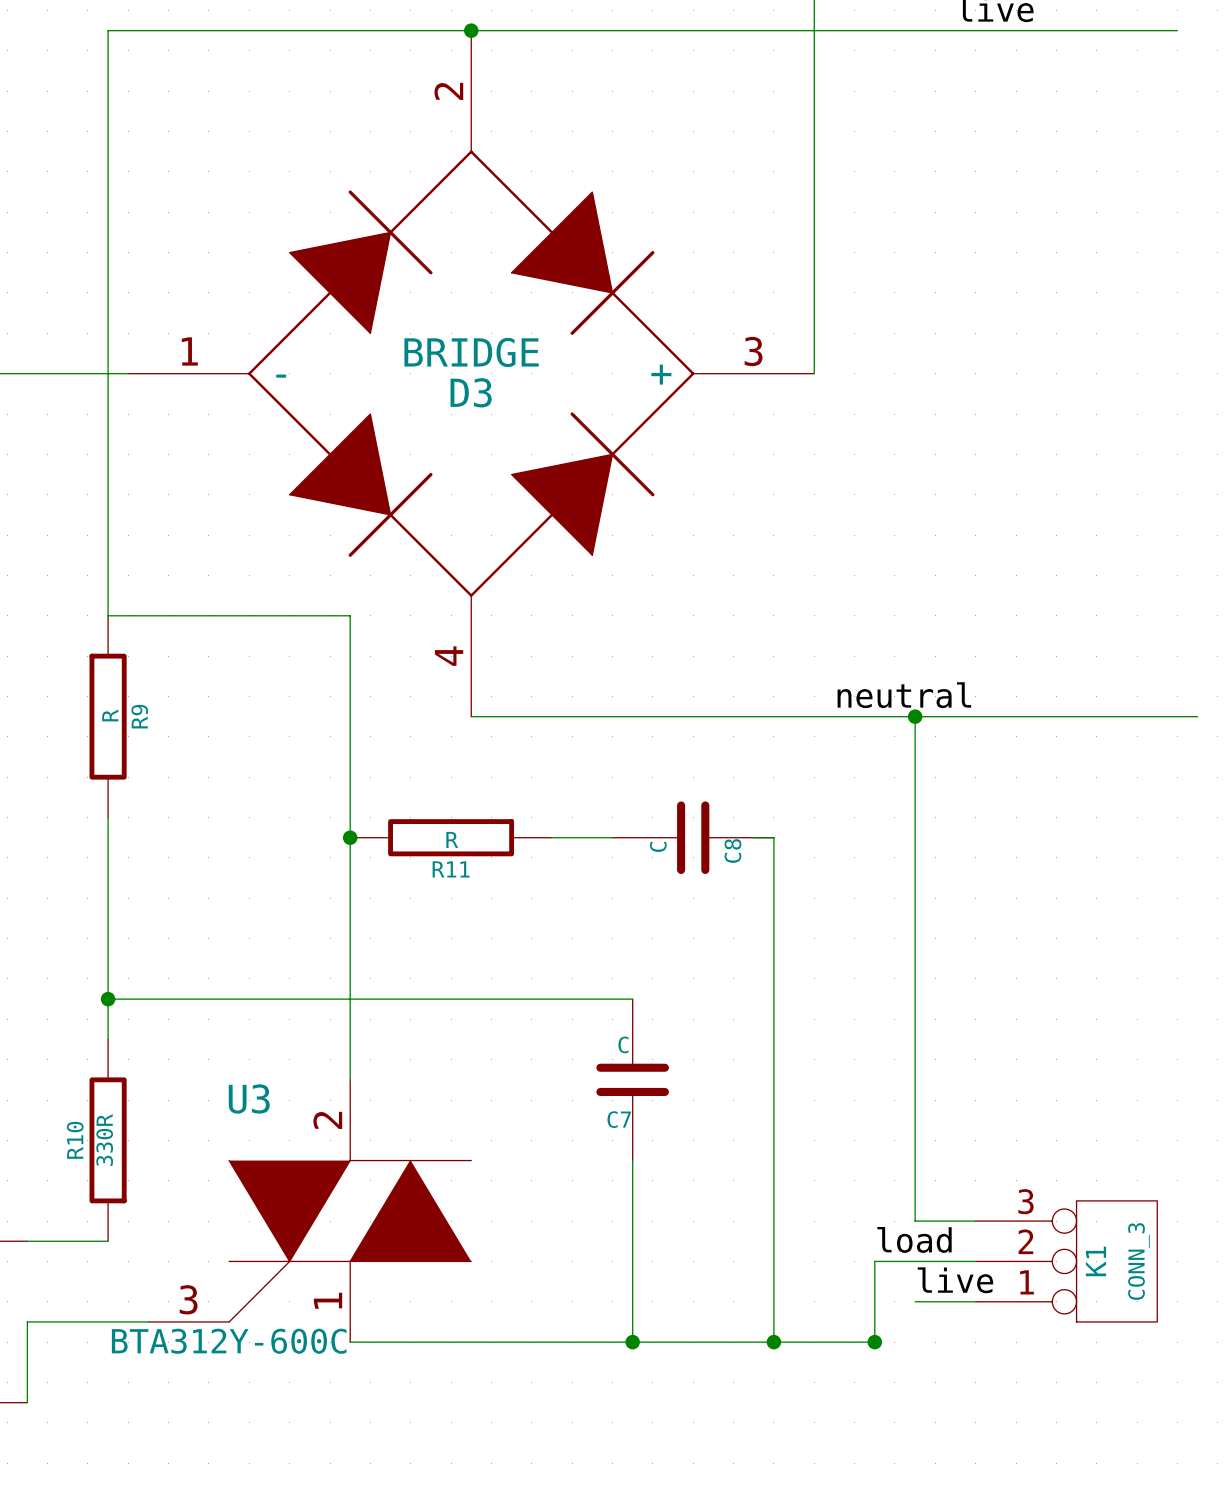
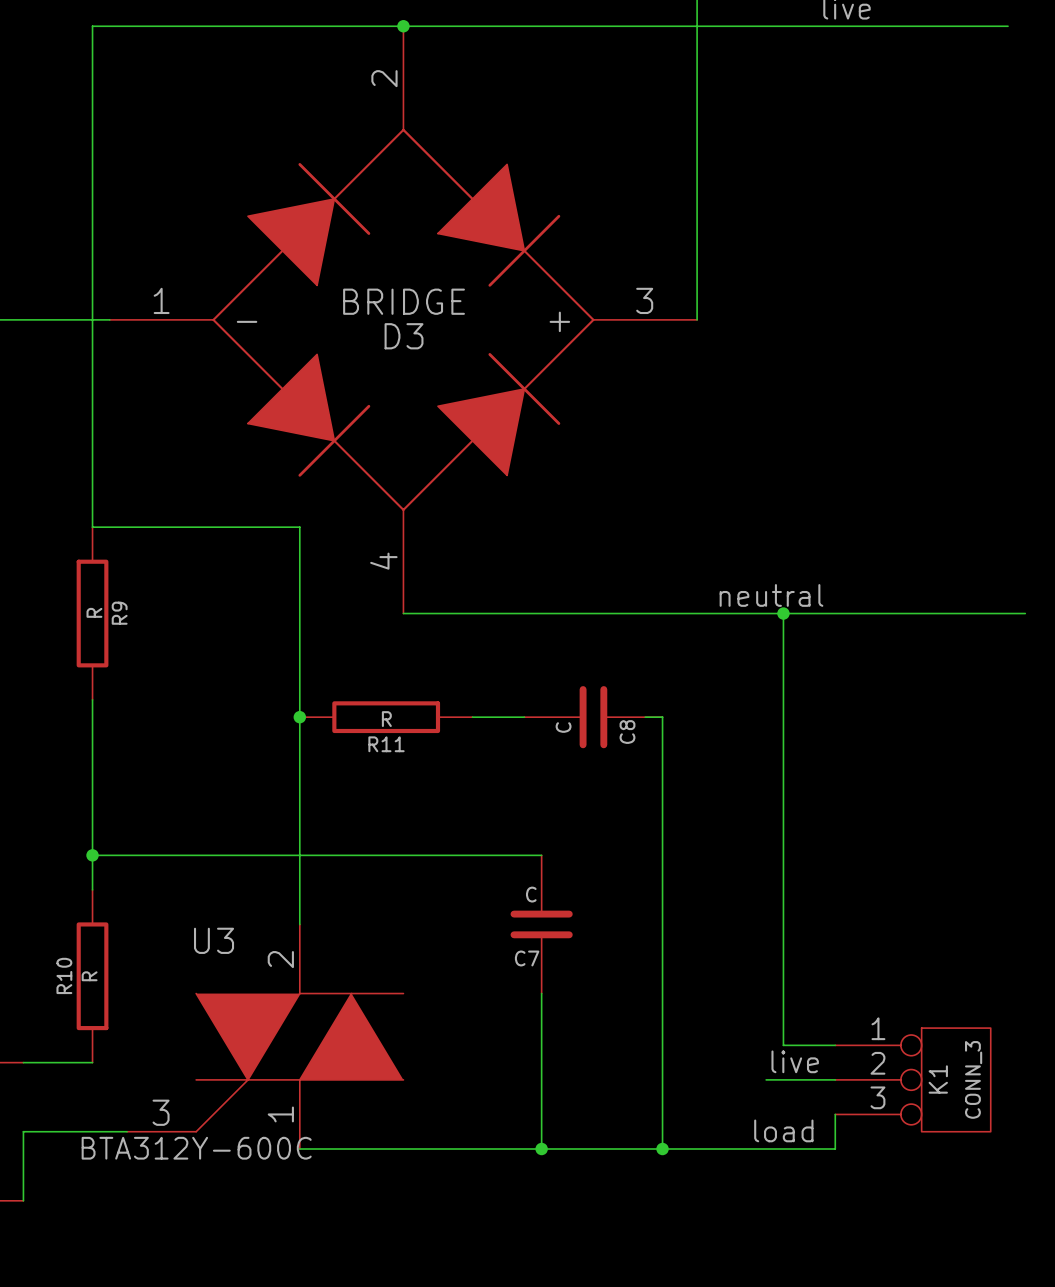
R10 value: 330R (104, 1140) -> R (89, 976)
label position: load (914, 1239) -> load (783, 1130)
wire: (894, 1261) (874, 1261) (874, 1342) -> none
K1 flip: as is (1116, 1261) -> up-down (956, 1079)
label position: live (955, 1280) -> live (795, 1061)
wire: (915, 1301) (975, 1301) -> (748, 1149) (835, 1149) (835, 1114)
junction: (874, 1342) -> none

